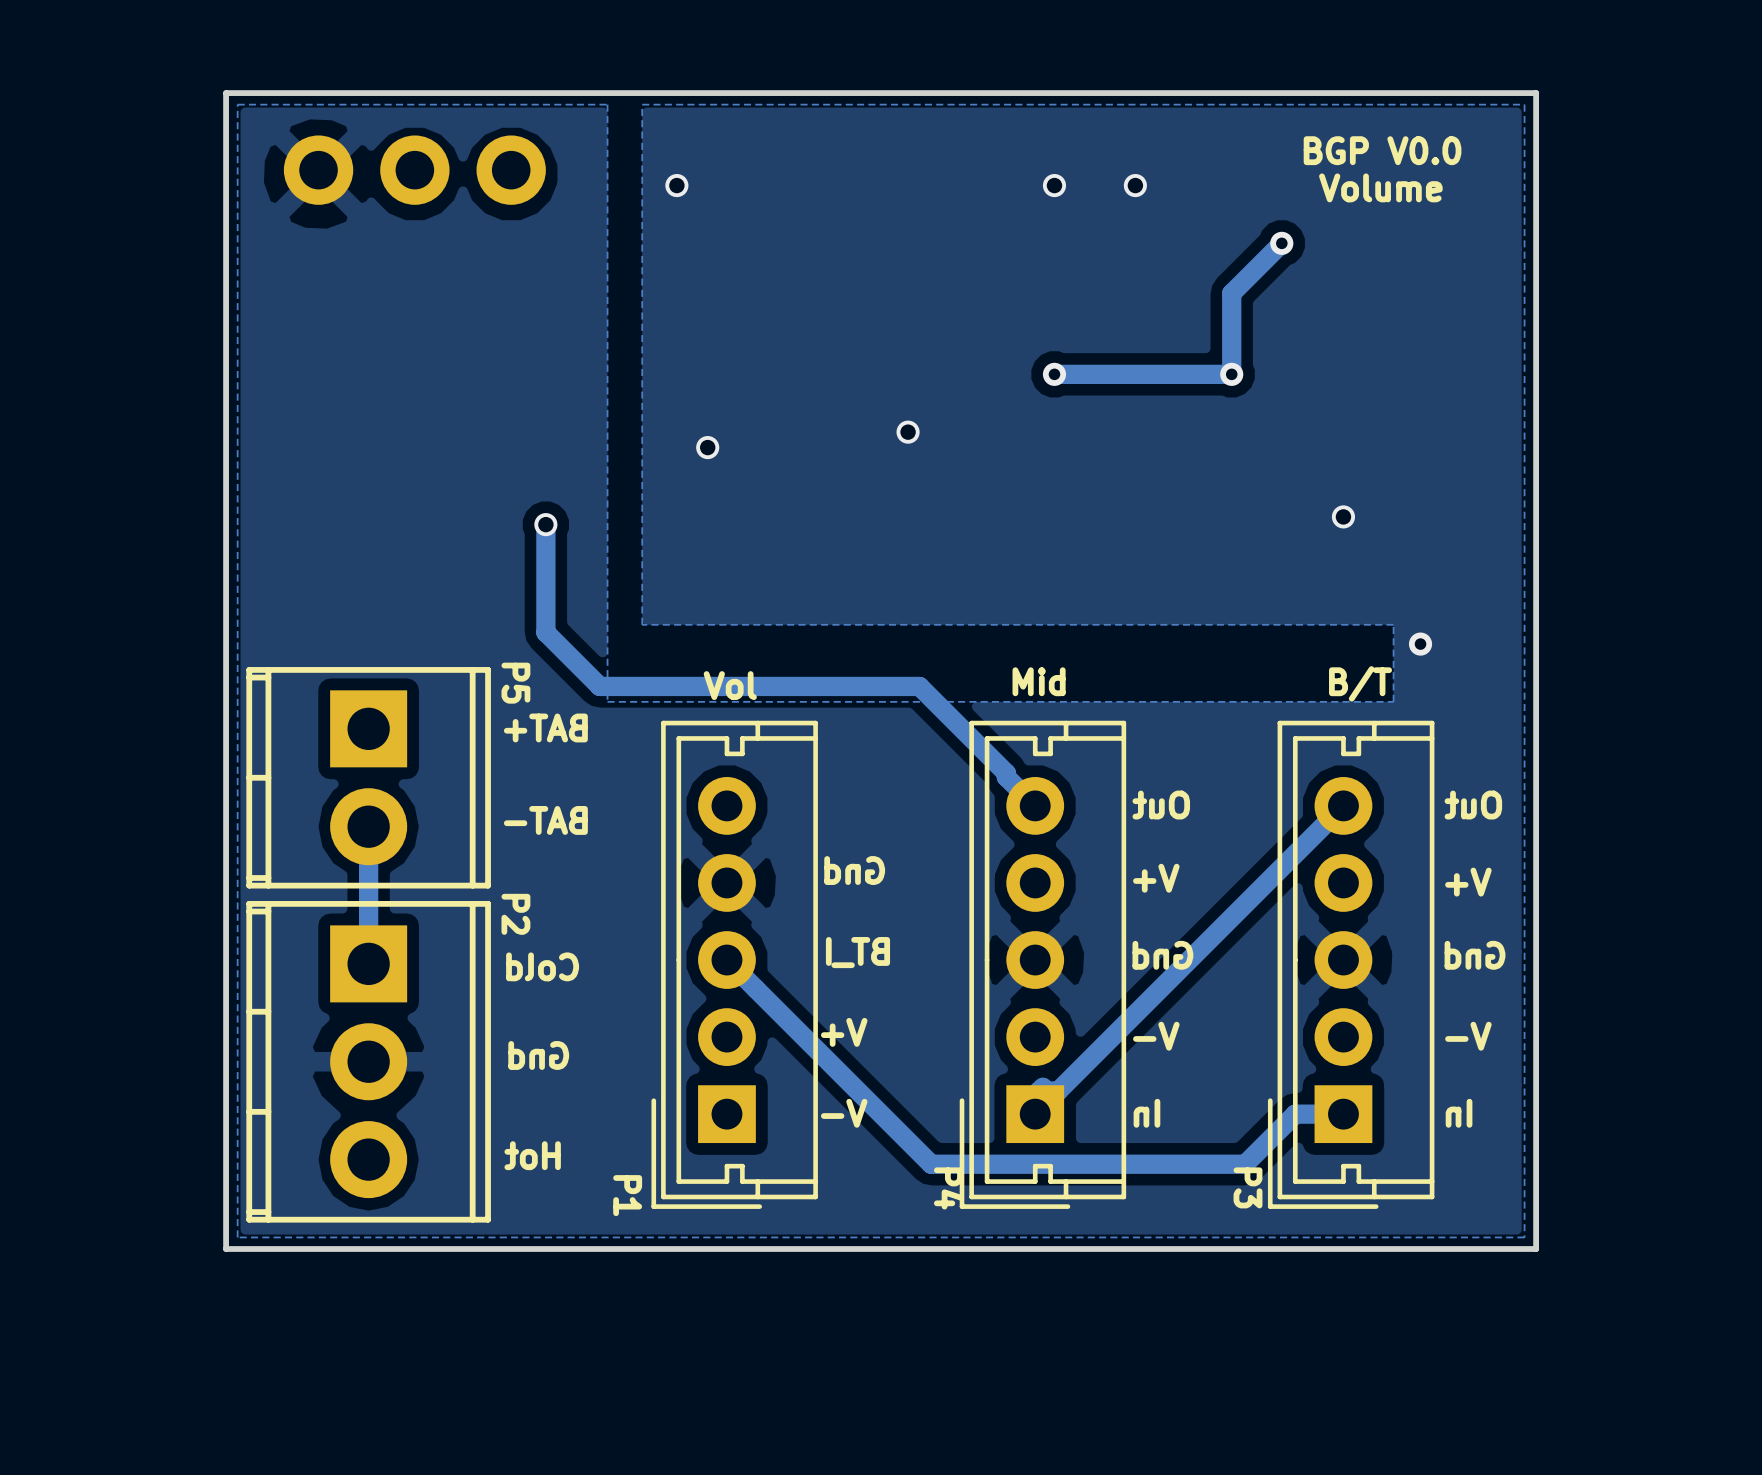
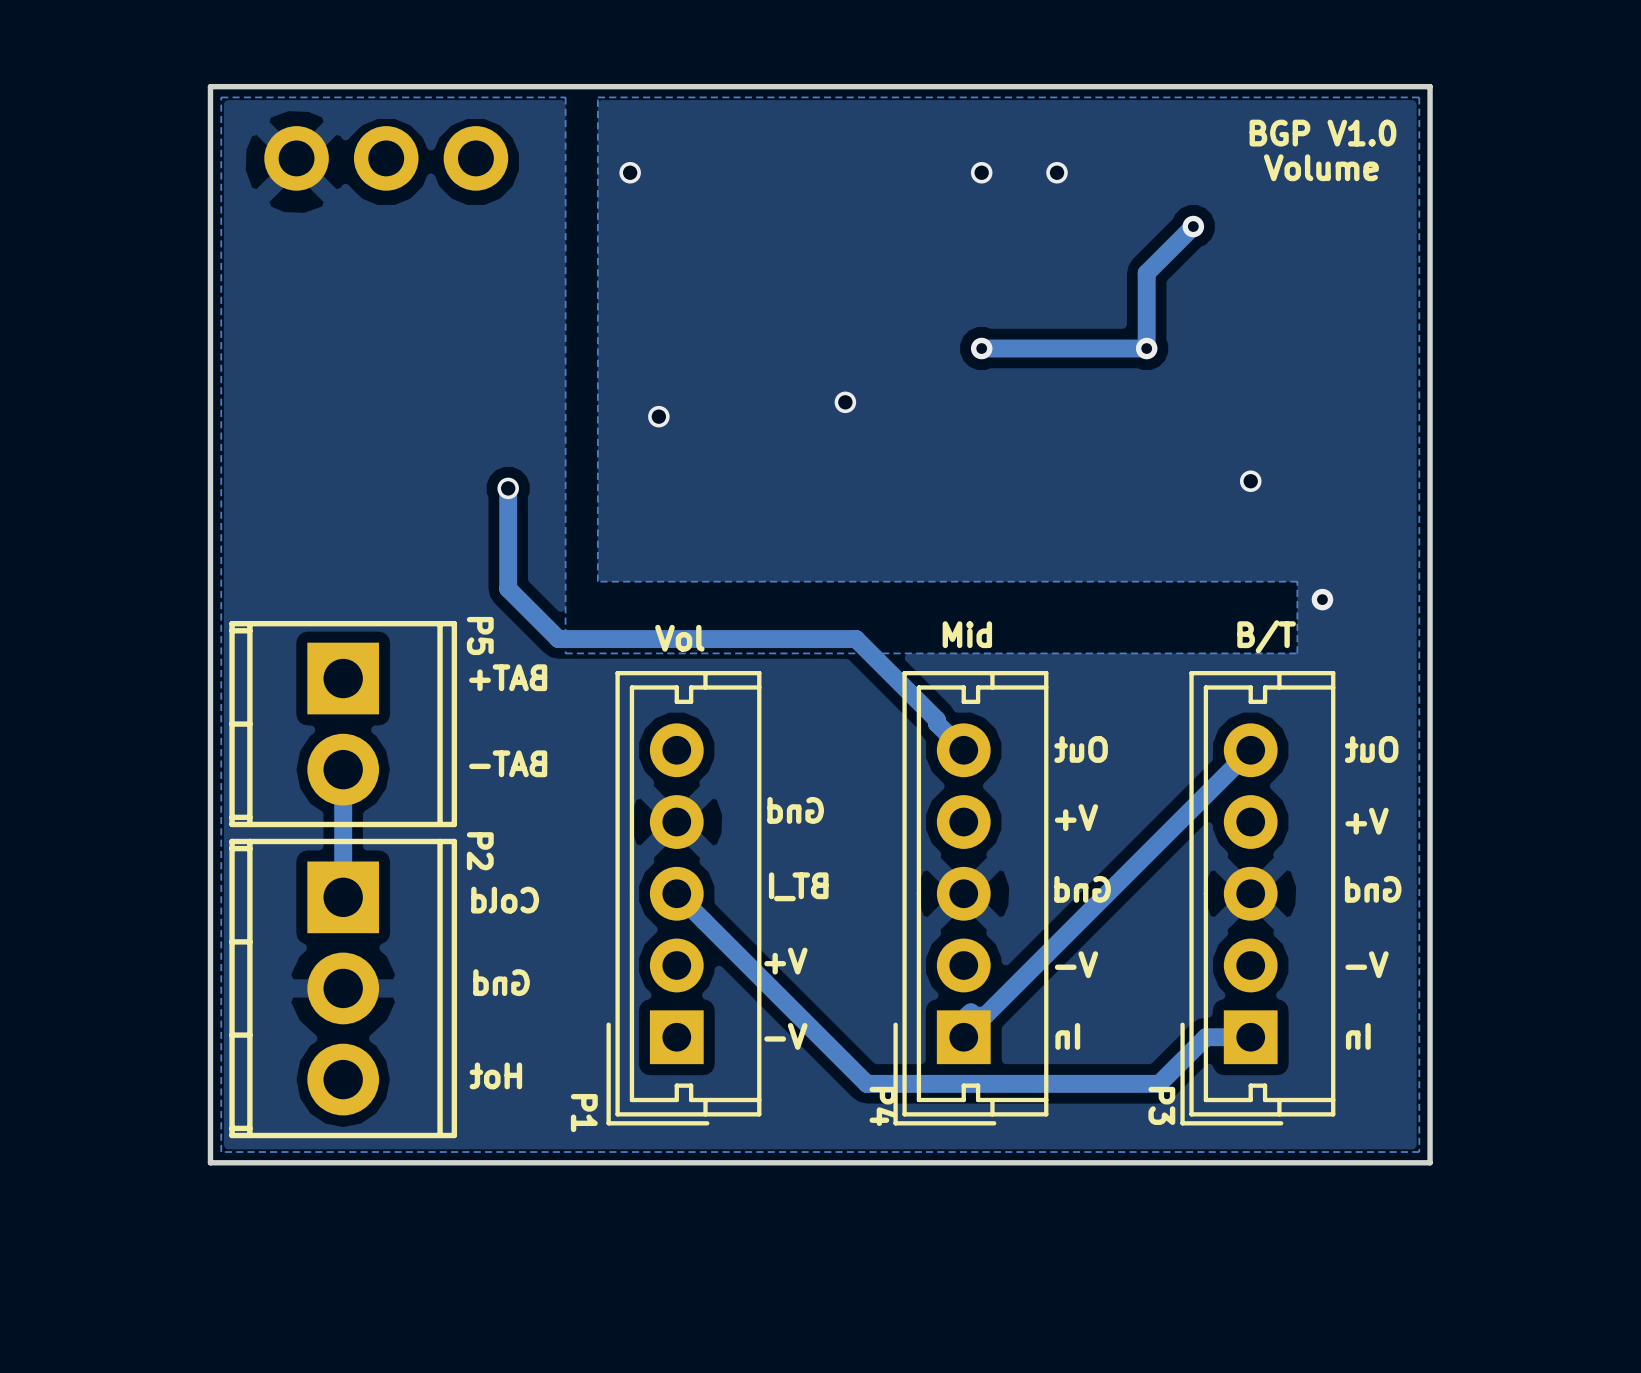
text: BGP V0.0 (1382, 150) -> BGP V1.0 (1322, 133)
text position: Volume (1380, 187) -> Volume (1321, 167)

